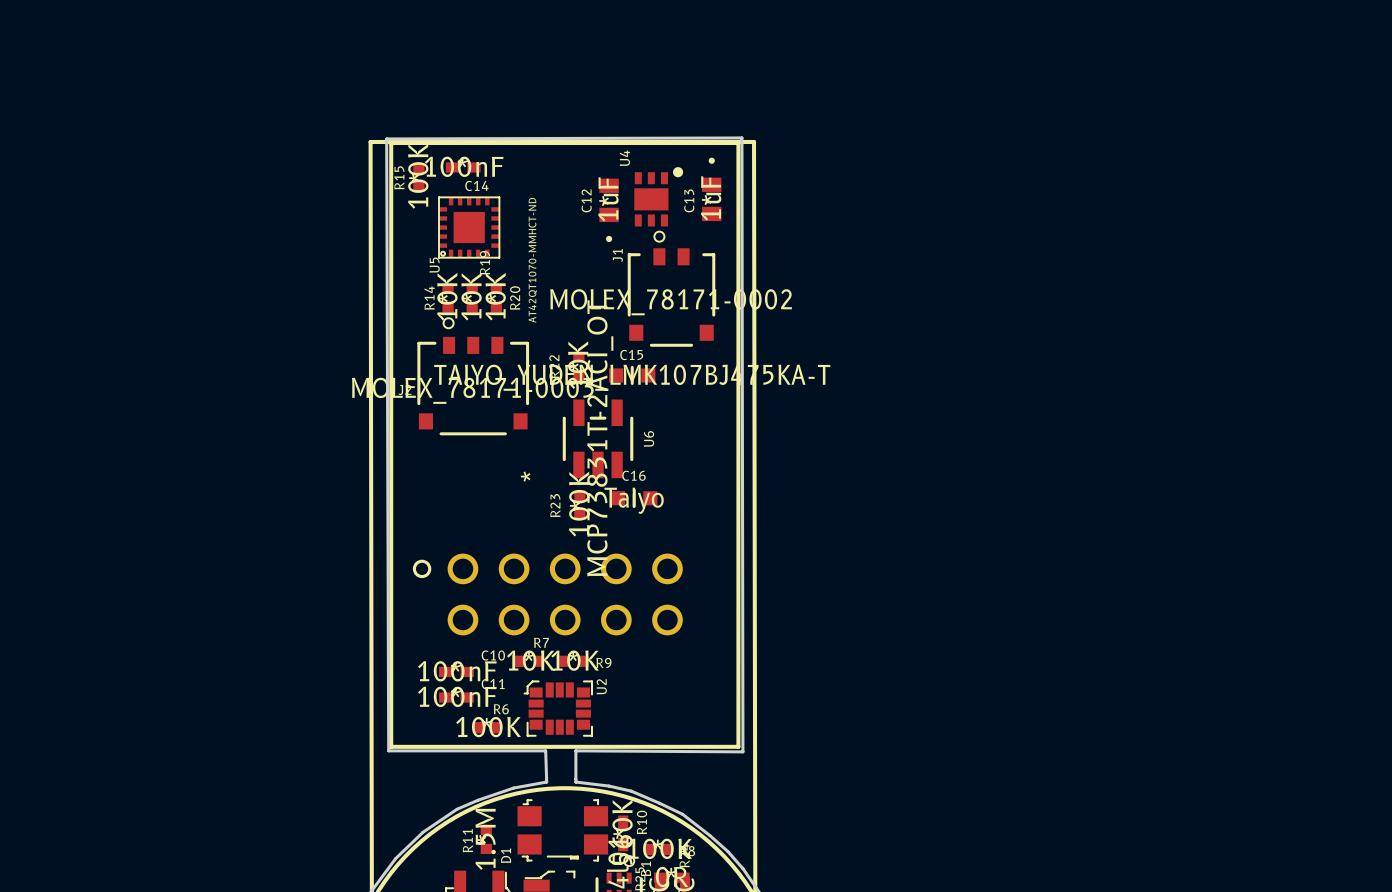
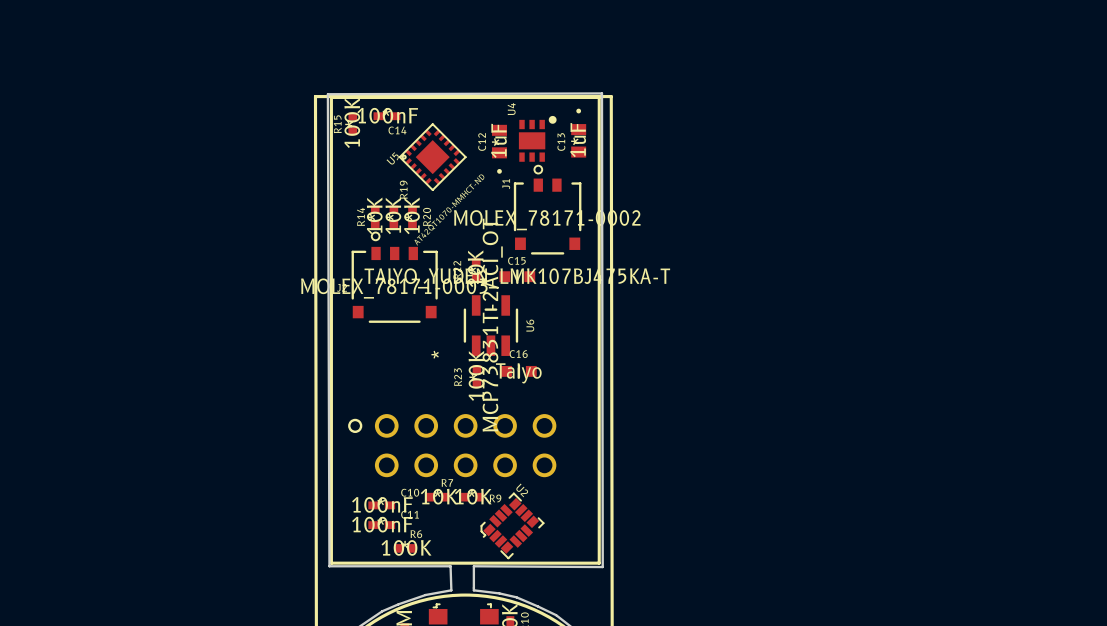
U5 rotation: 0° (469, 227) -> 45° clockwise (432, 157)
U5 position: (469, 227) -> (432, 157)
U2 rotation: 0° (558, 708) -> 45° counterclockwise (512, 525)
U2 position: (558, 708) -> (512, 525)

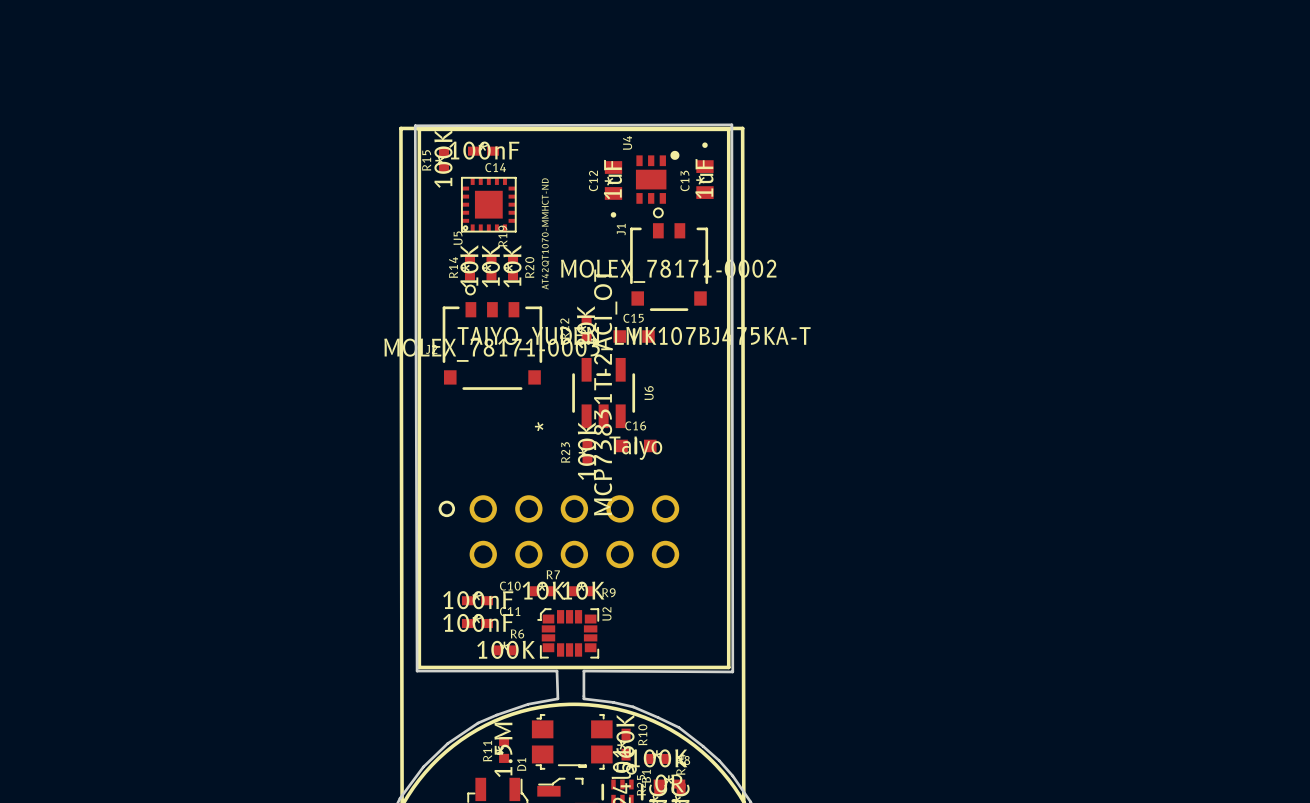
U5 rotation: 0° (432, 157) -> 45° counterclockwise (488, 204)
U5 position: (432, 157) -> (488, 204)
U2 rotation: 0° (512, 525) -> 45° clockwise (568, 633)
U2 position: (512, 525) -> (568, 633)

